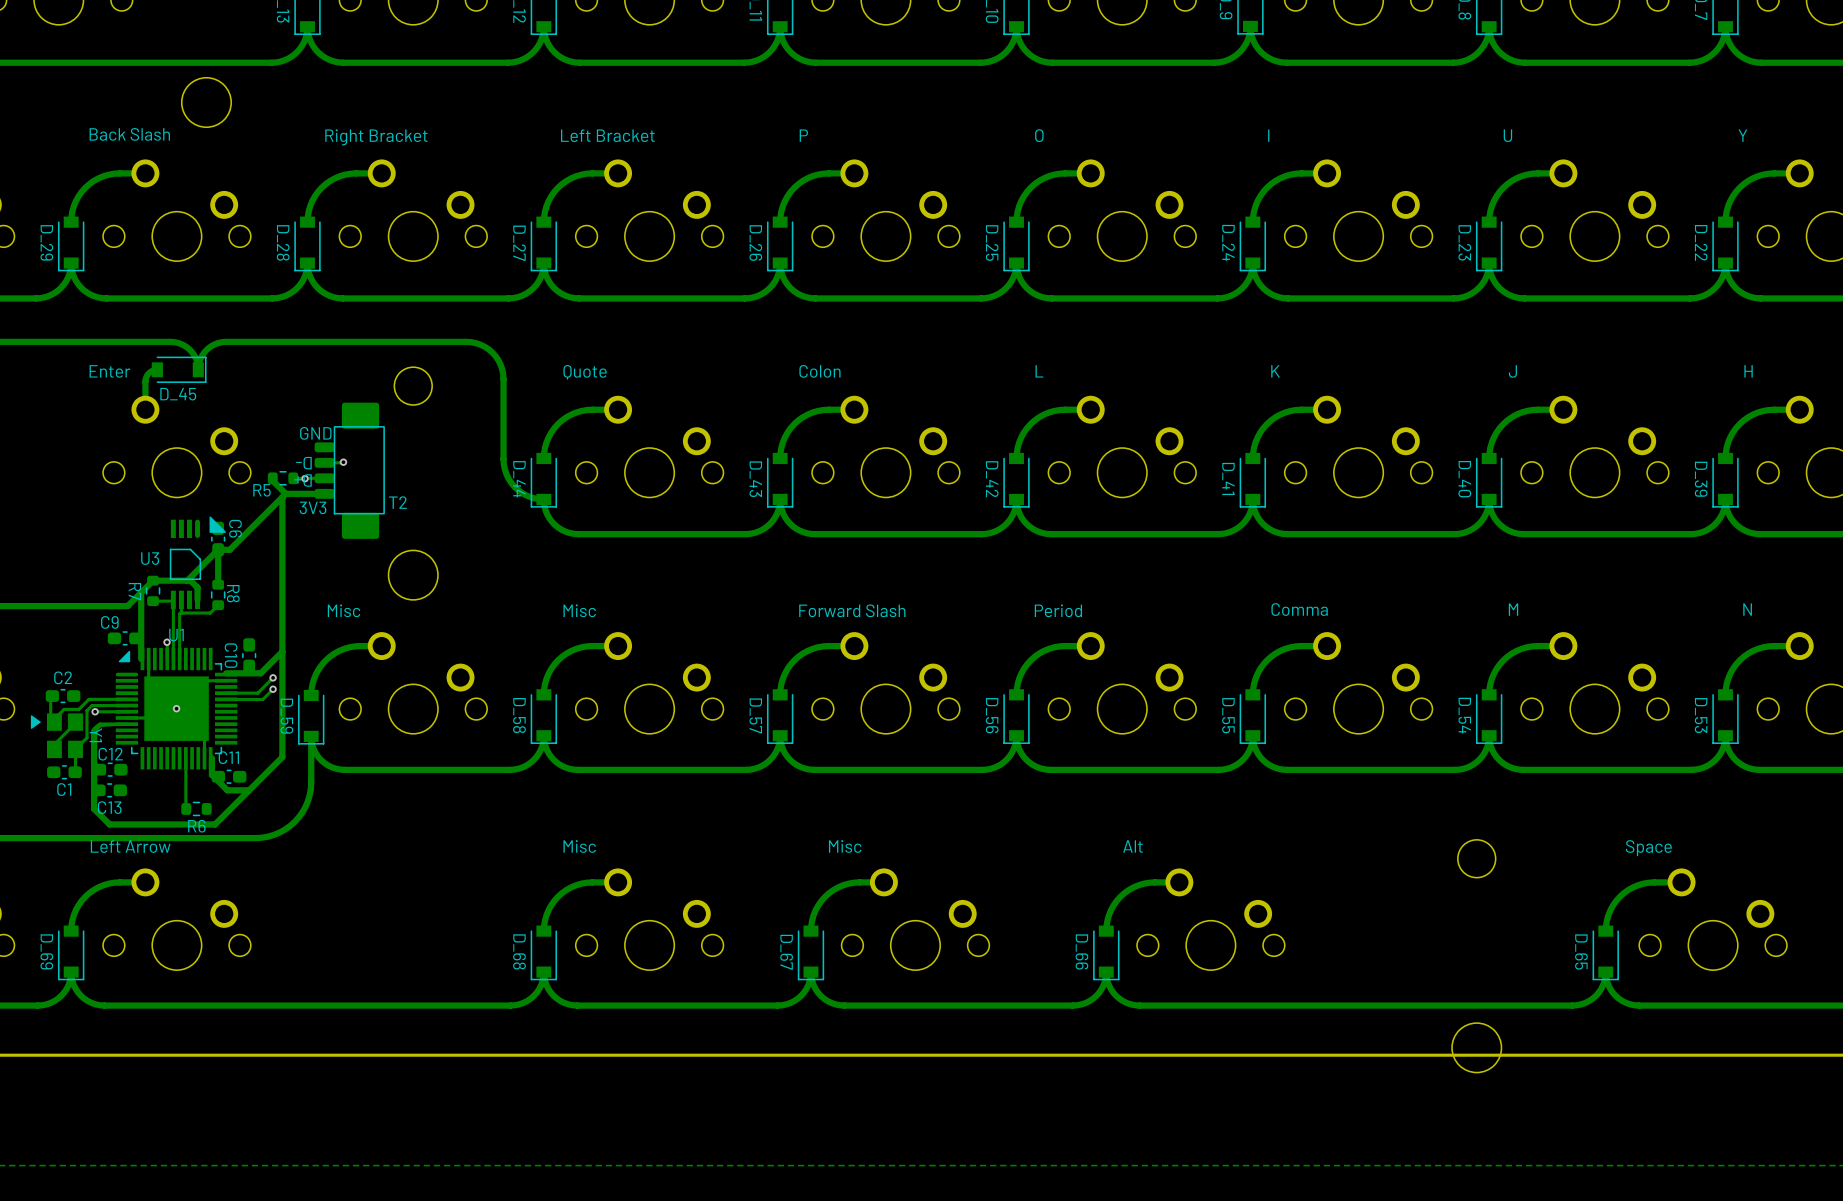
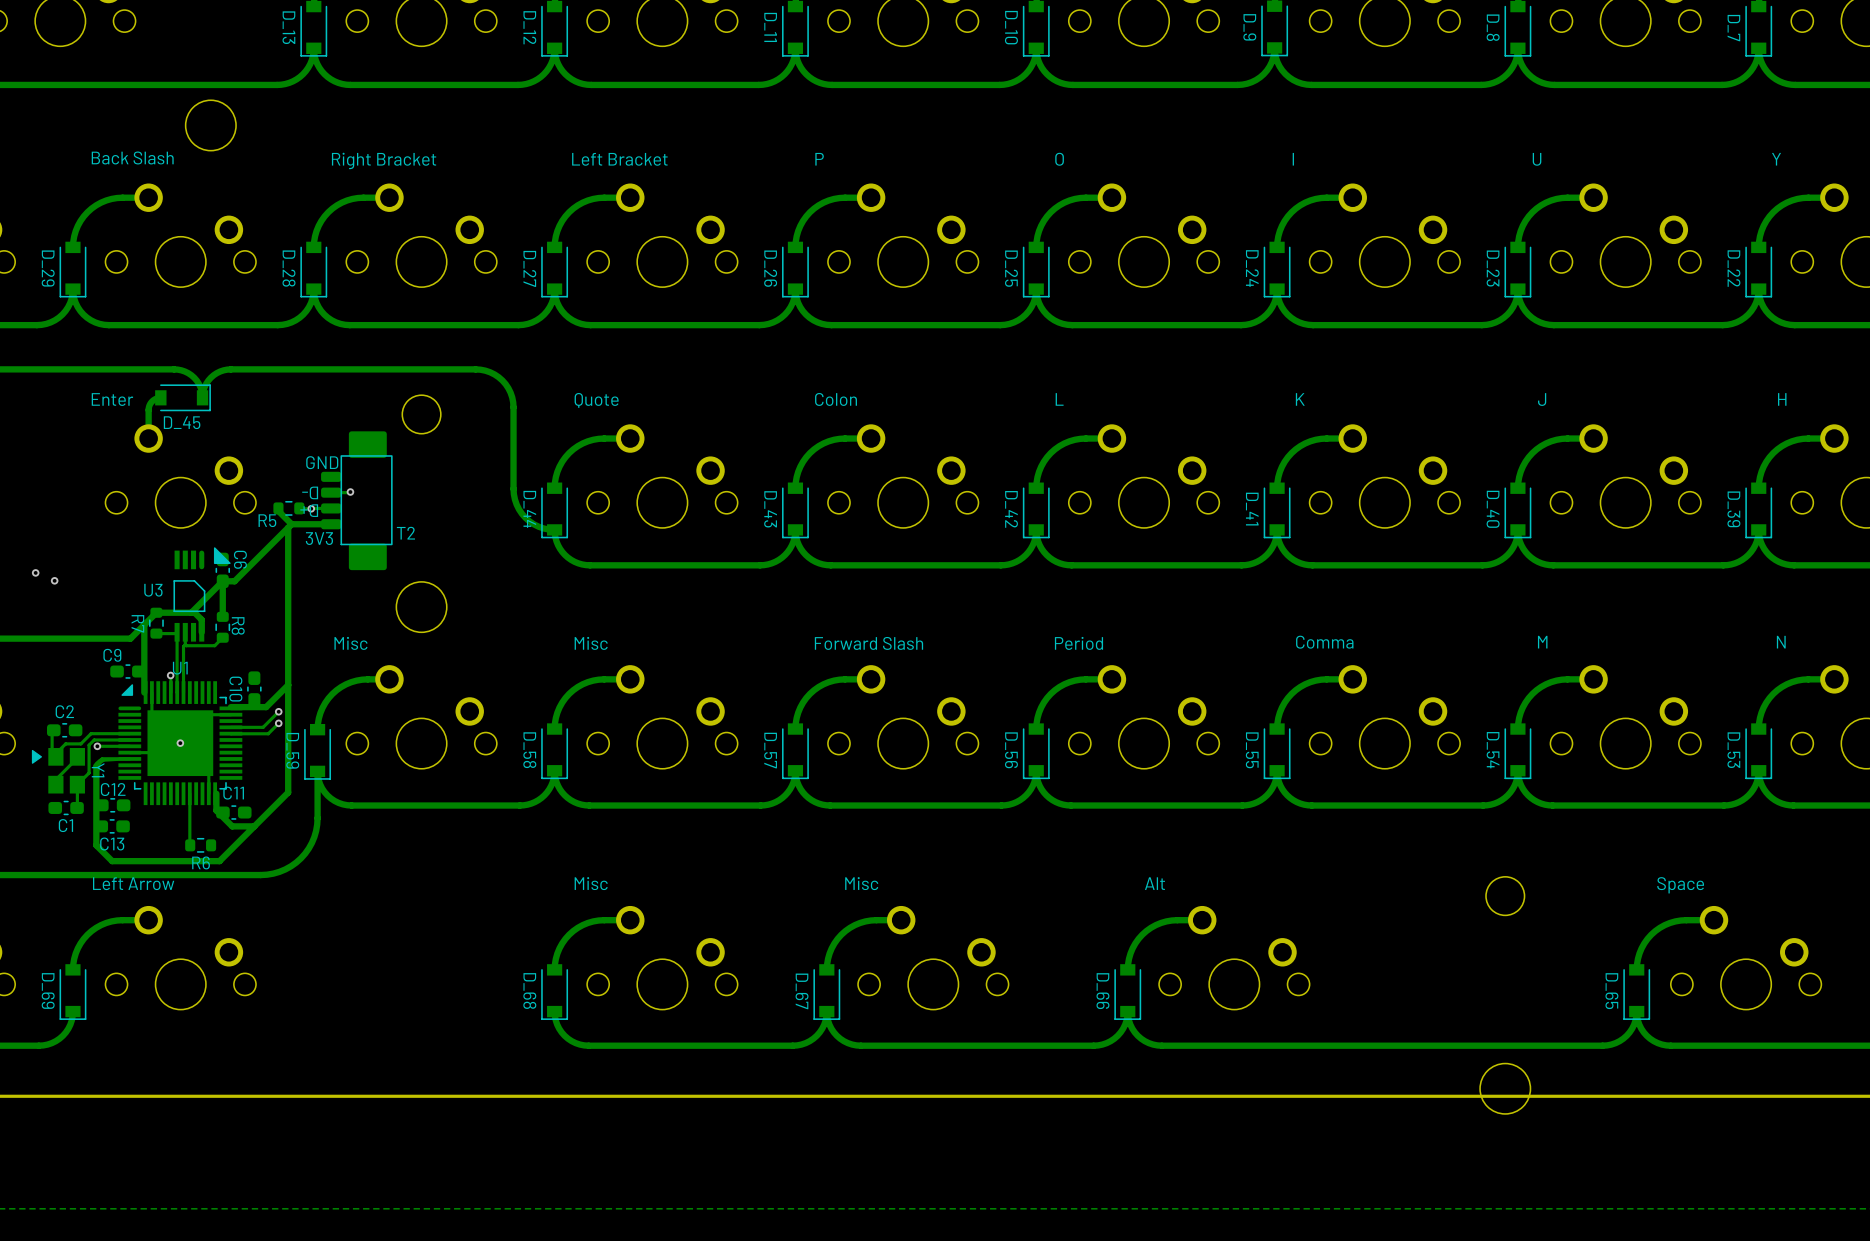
via: none -> (35, 572)
via: none -> (54, 580)
track: (543, 972) (541, 984) (534, 995) (523, 1003) (510, 1005) (100, 1005) (87, 1001) (78, 992) (72, 980) (71, 972) -> none

